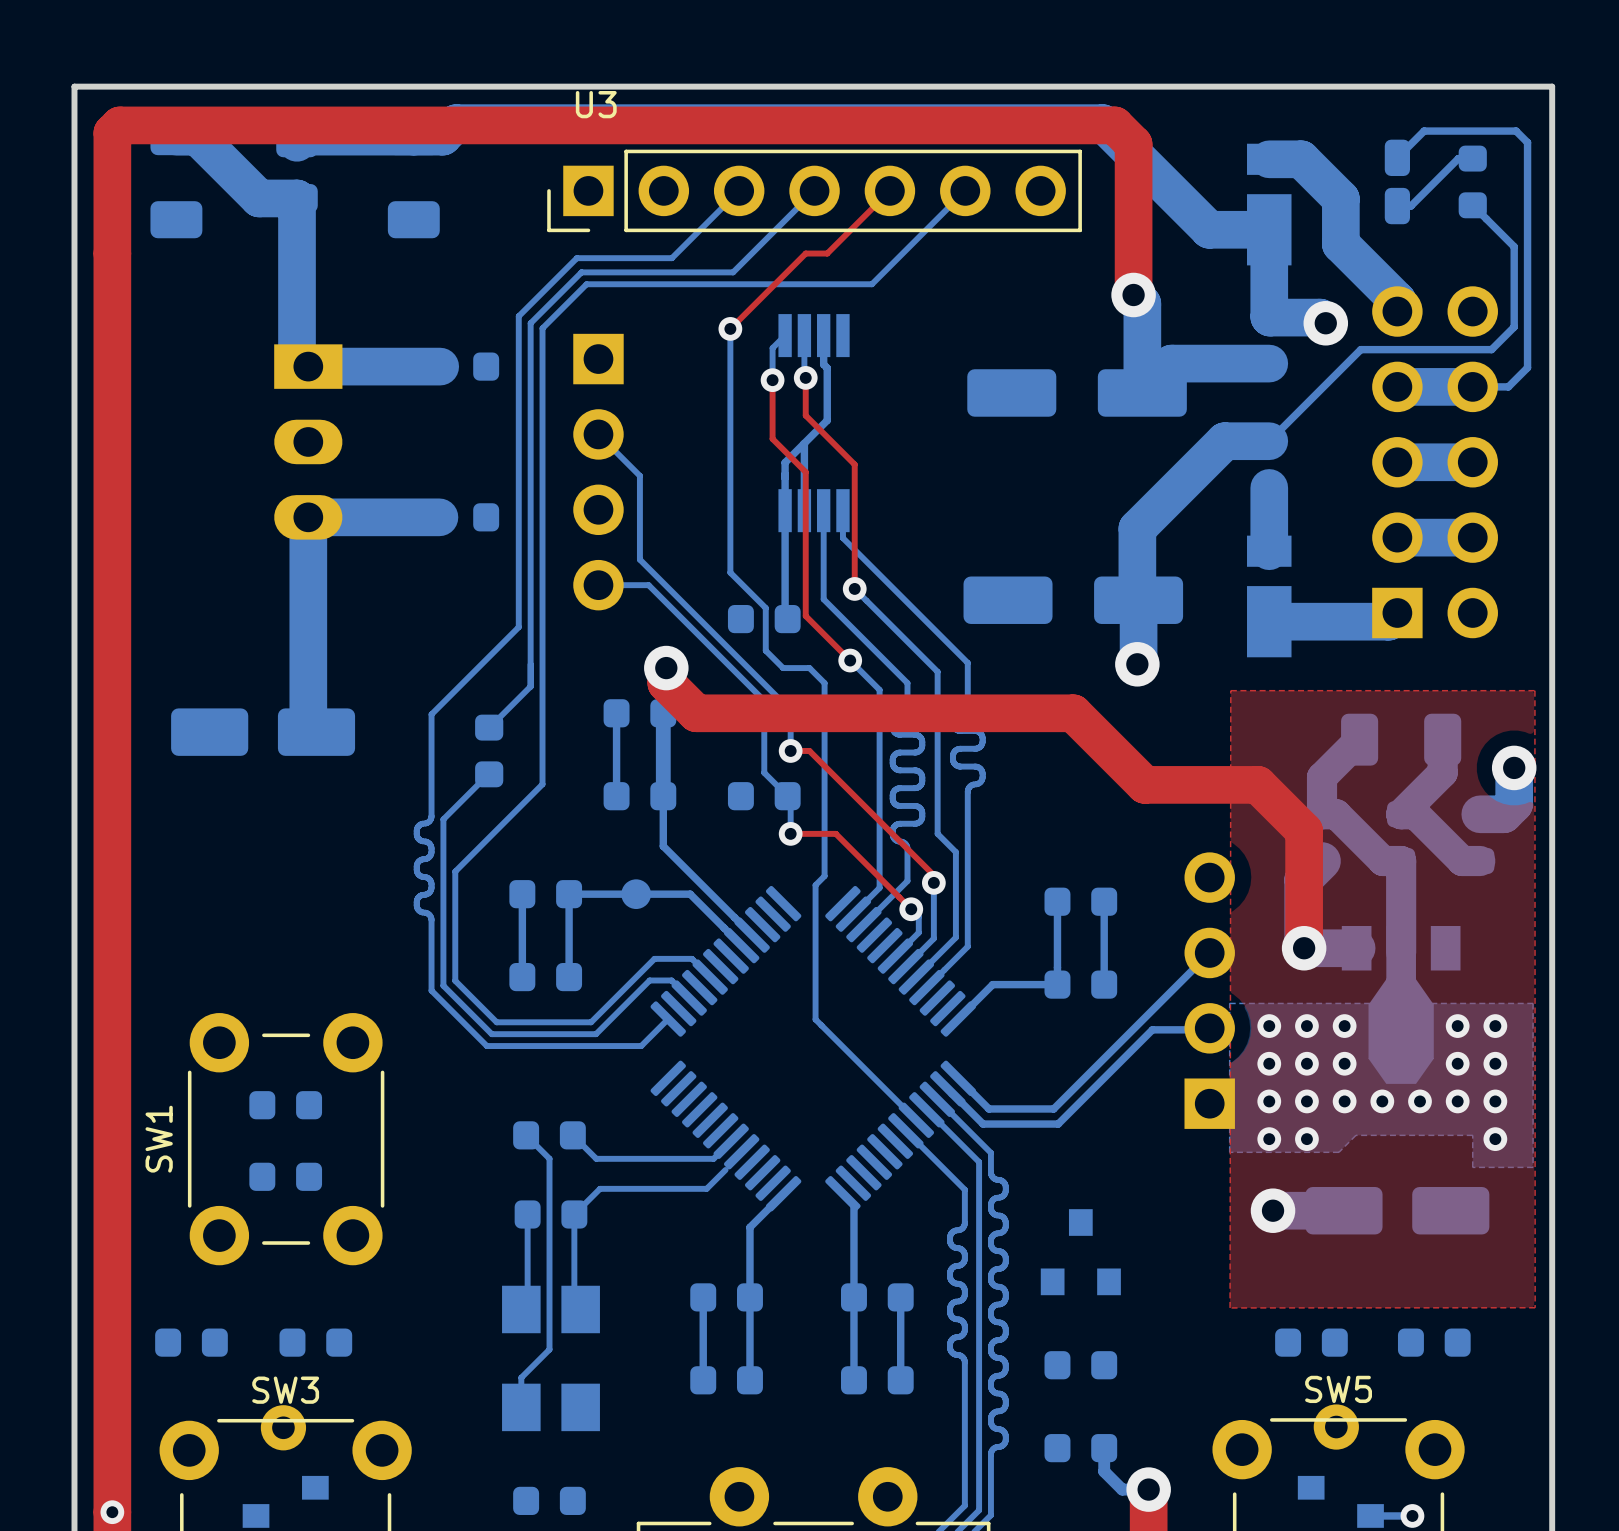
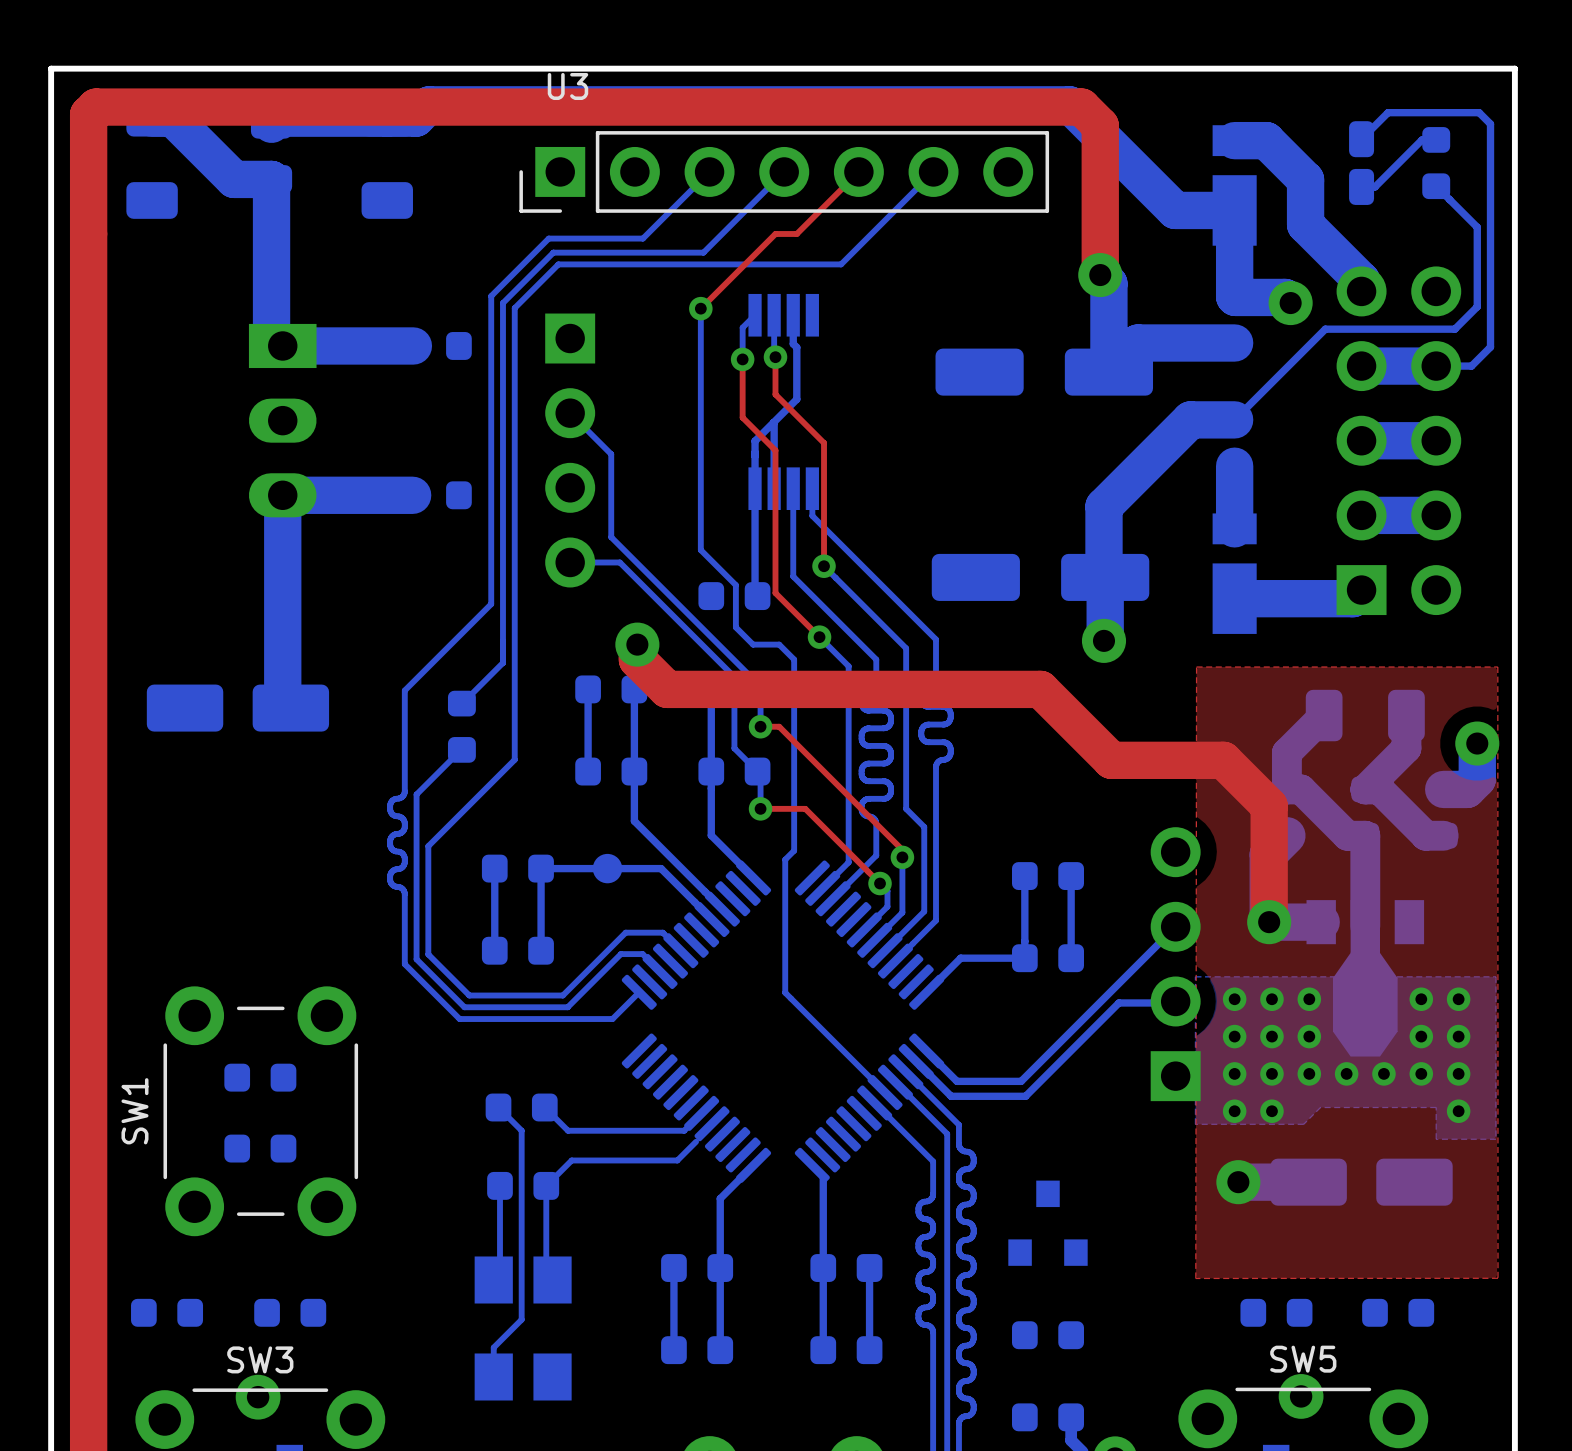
bottom track width: thick (663, 713) (663, 796) -> thin (634, 689) (634, 771)
bottom track: none -> (711, 689) (711, 835) (753, 877)

